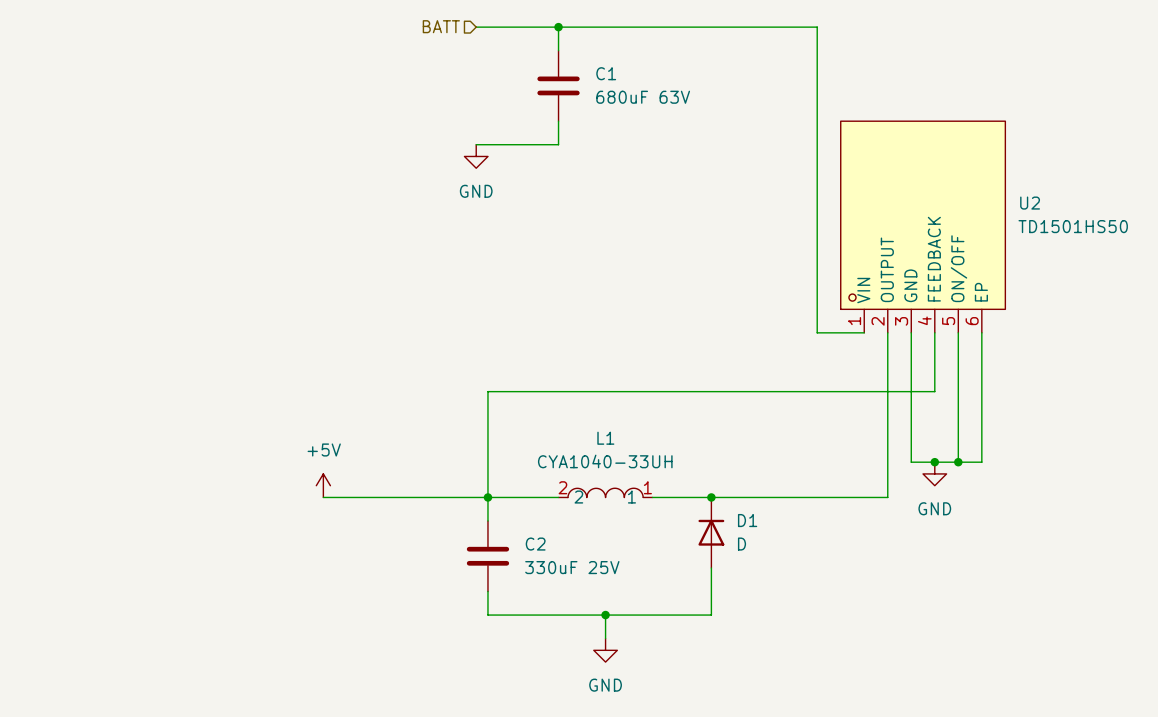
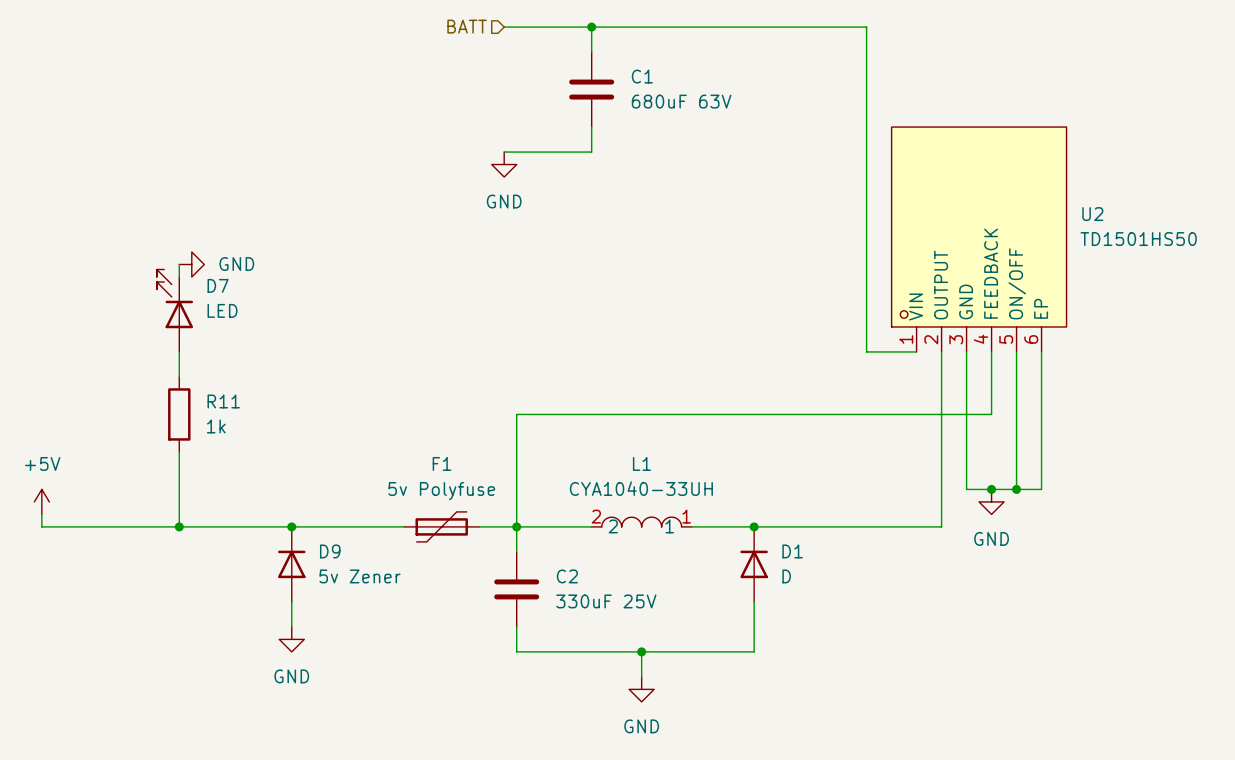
wire: none -> (179, 264) (179, 277)
power symbol: none -> GND (191, 264)
D7: none -> LED (174, 310)
wire: none -> (179, 351) (179, 376)
R11: none -> 1k (179, 414)
wire: none -> (179, 451) (179, 526)
power symbol: none -> +5V (41, 501)
wire: none -> (41, 514) (41, 526) (341, 526)
power symbol: +5V (323, 485) -> none
junction: none -> (179, 526)
junction: none -> (291, 526)
F1: none -> 5v Polyfuse (441, 526)
D9: none -> 5v Zener (291, 564)
wire: none -> (291, 601) (291, 626)
power symbol: none -> GND (291, 639)

